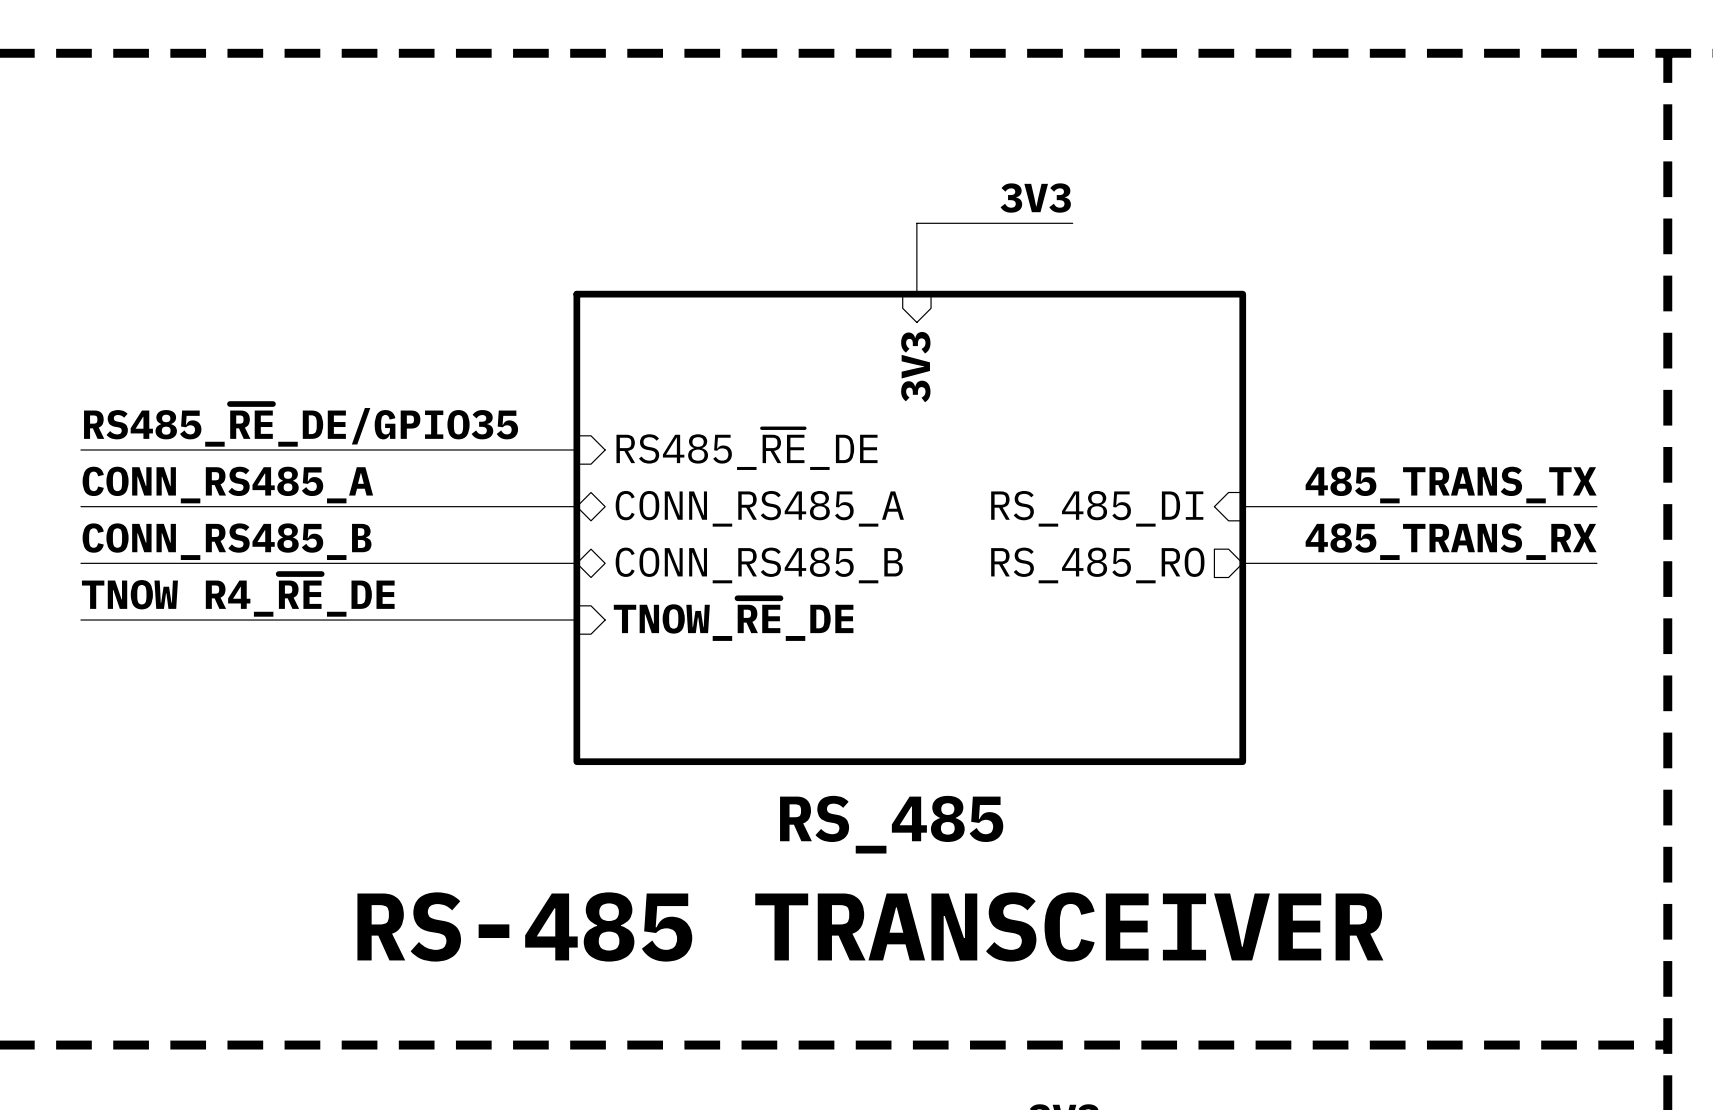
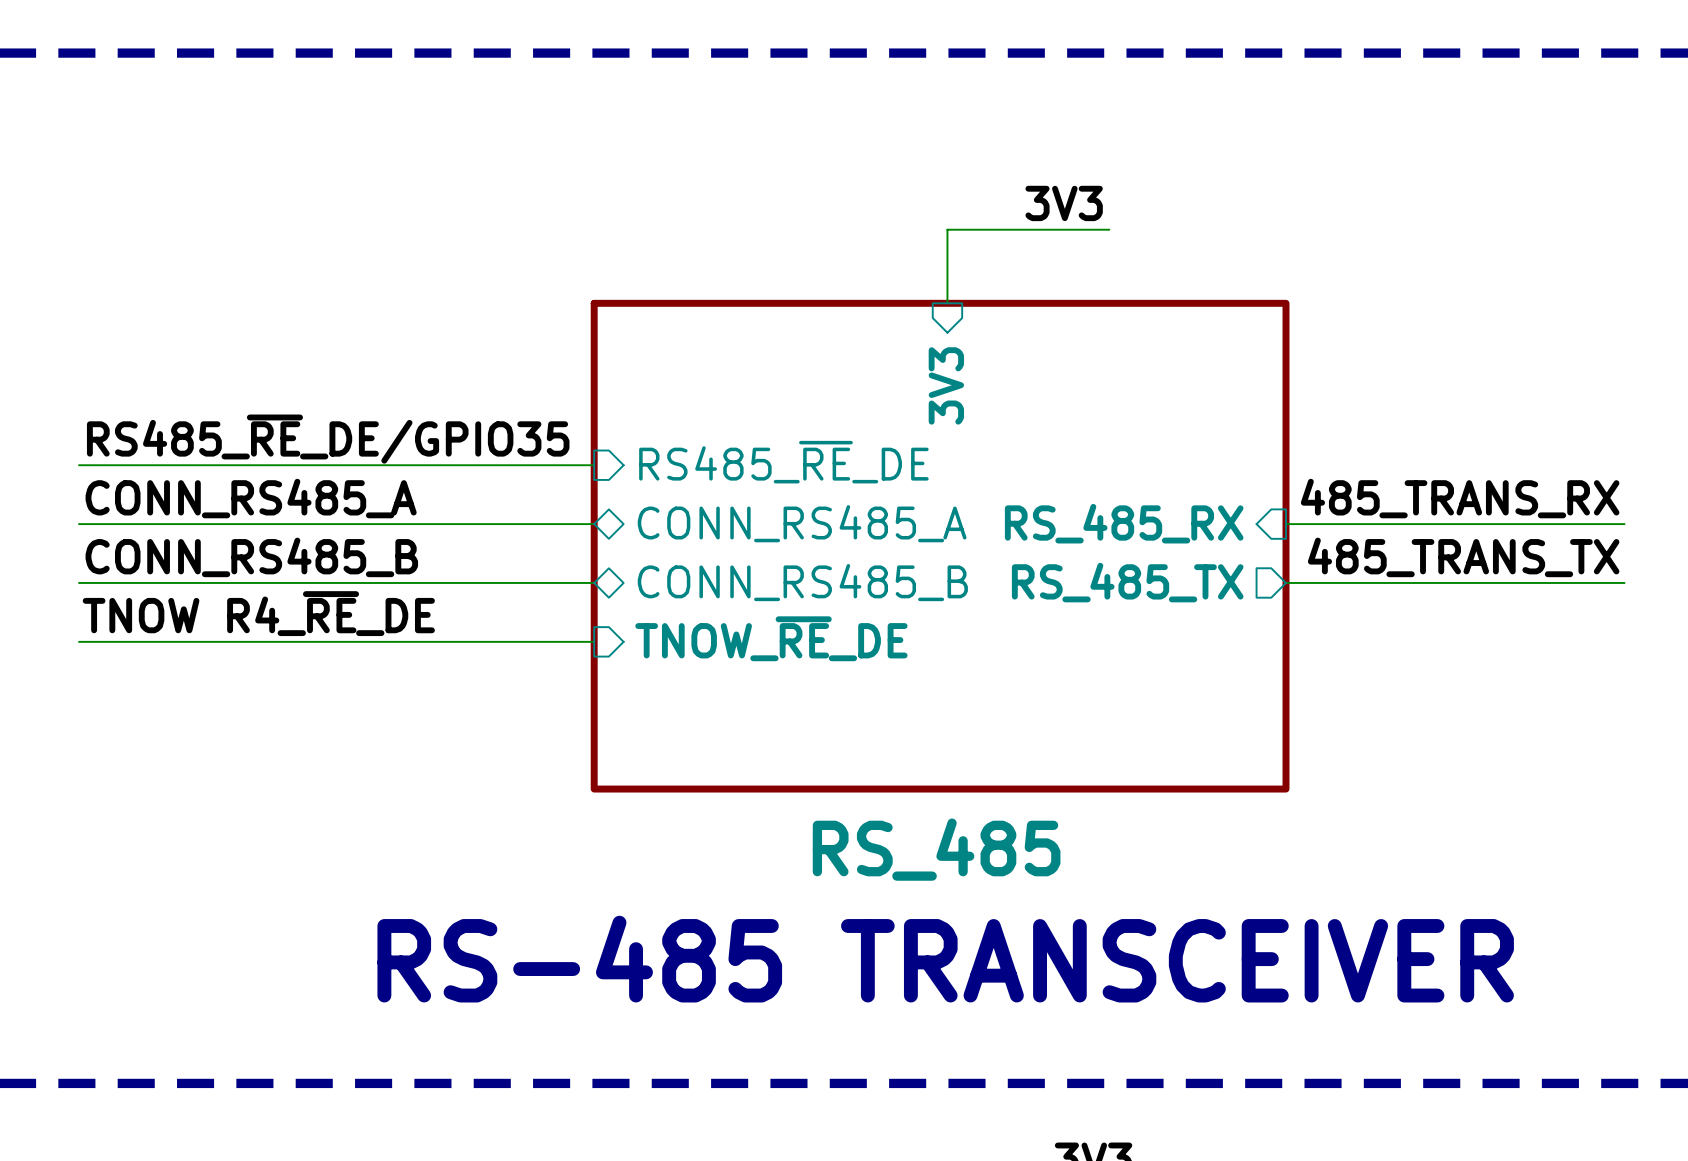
label position: 485_TRANS_TX (1451, 485) -> 485_TRANS_TX (1463, 557)
wire: (1568, 506) (1596, 506) -> none
sheet pin: RS_485_DI (1097, 508) -> RS_485_RX (1124, 523)
label position: 485_TRANS_RX (1451, 541) -> 485_TRANS_RX (1460, 498)
wire: (1568, 563) (1596, 563) -> none
sheet pin: RS_485_RO (1097, 565) -> RS_485_TX (1127, 582)

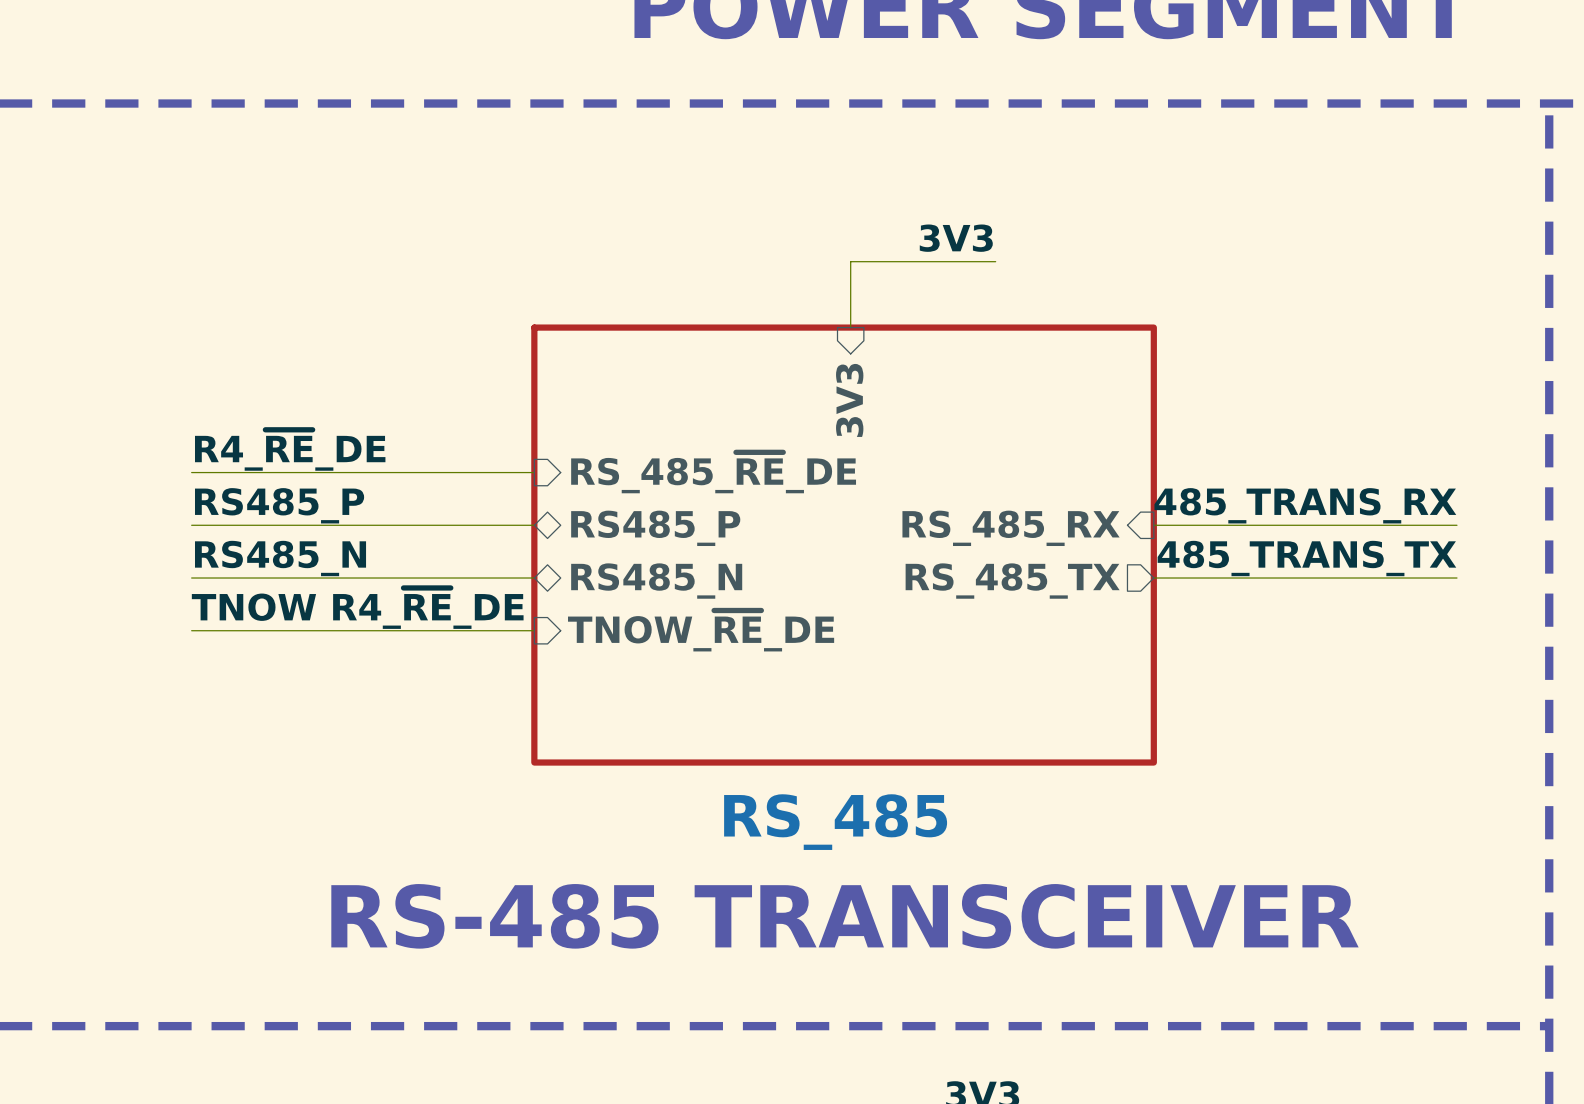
label: RS485_~{RE}_DE/GPIO35 (328, 439) -> R4_~{RE}_DE (290, 450)
sheet pin: RS485_~{RE}_DE (783, 462) -> RS_485_~{RE}_DE (713, 472)
wire: (79, 465) (211, 465) -> none
label: CONN_RS485_A (251, 498) -> none
label: none -> RS485_P (279, 505)
sheet pin: CONN_RS485_A (802, 523) -> RS485_P (655, 528)
wire: (79, 524) (211, 524) -> none
label: CONN_RS485_B (251, 557) -> none
label: none -> RS485_N (280, 558)
wire: (79, 582) (211, 582) -> none
sheet pin: CONN_RS485_B (802, 582) -> RS485_N (656, 581)
label position: TNOW R4_~{RE}_DE (258, 613) -> TNOW R4_~{RE}_DE (357, 608)
wire: (79, 641) (211, 641) -> none

